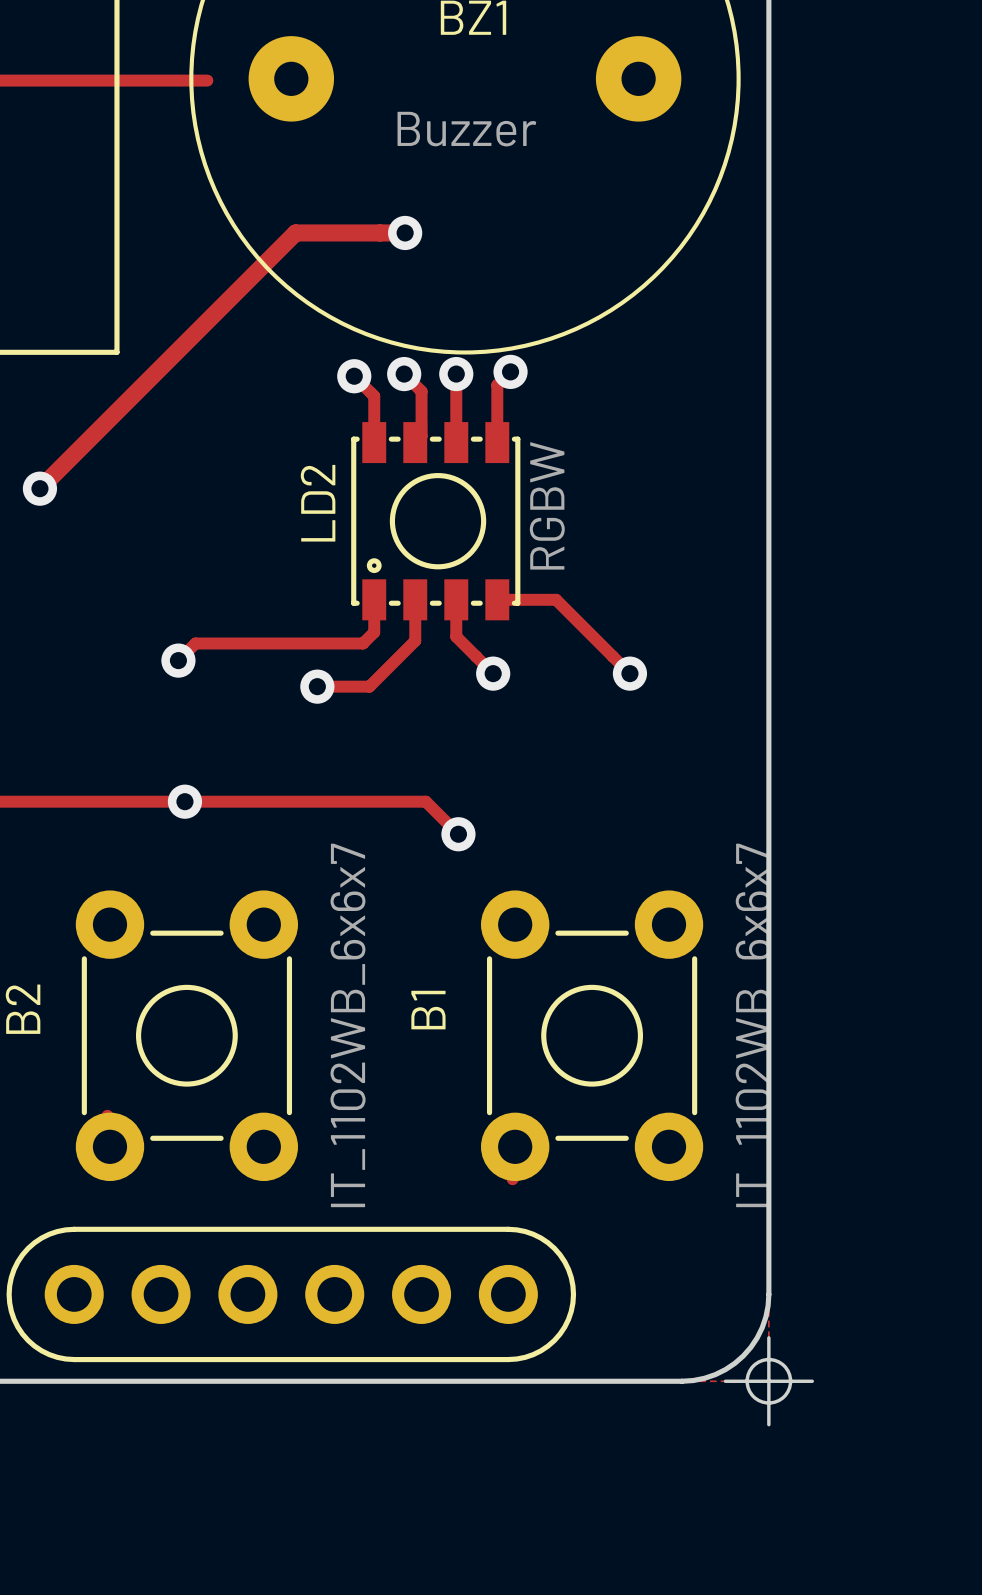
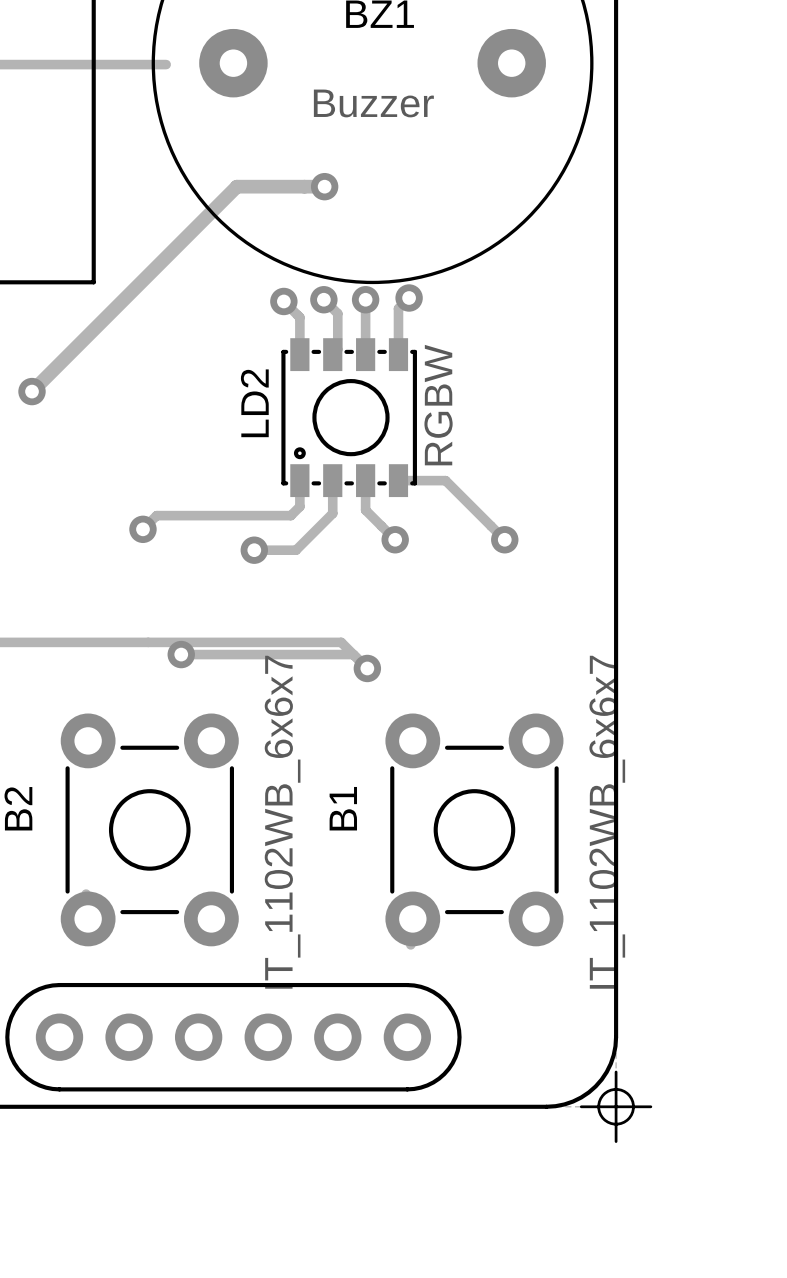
via position: (184, 801) -> (181, 654)
track: none -> (181, 654) (353, 654)

